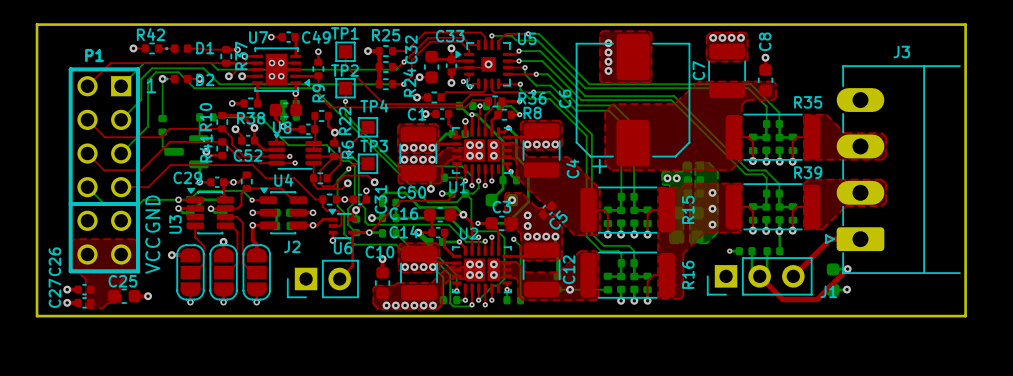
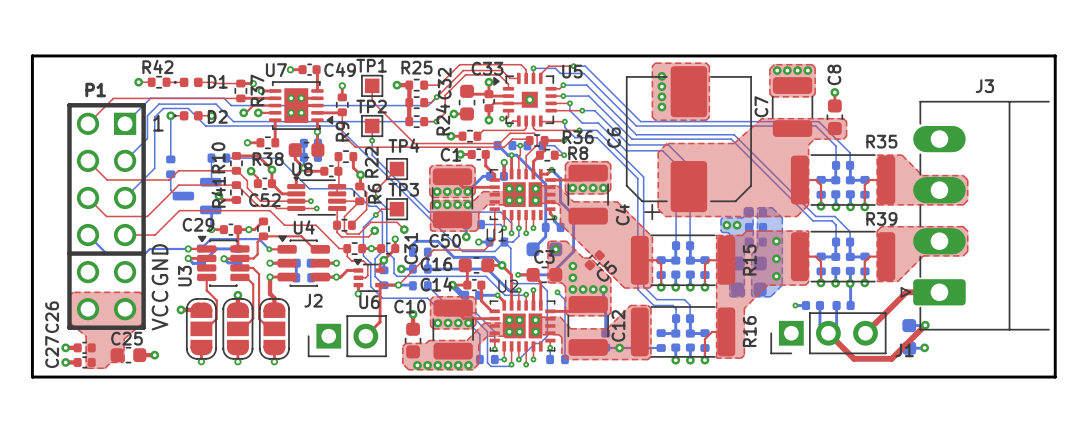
U5 footprint: [455, 39, 514, 89] -> [493, 72, 557, 127]

